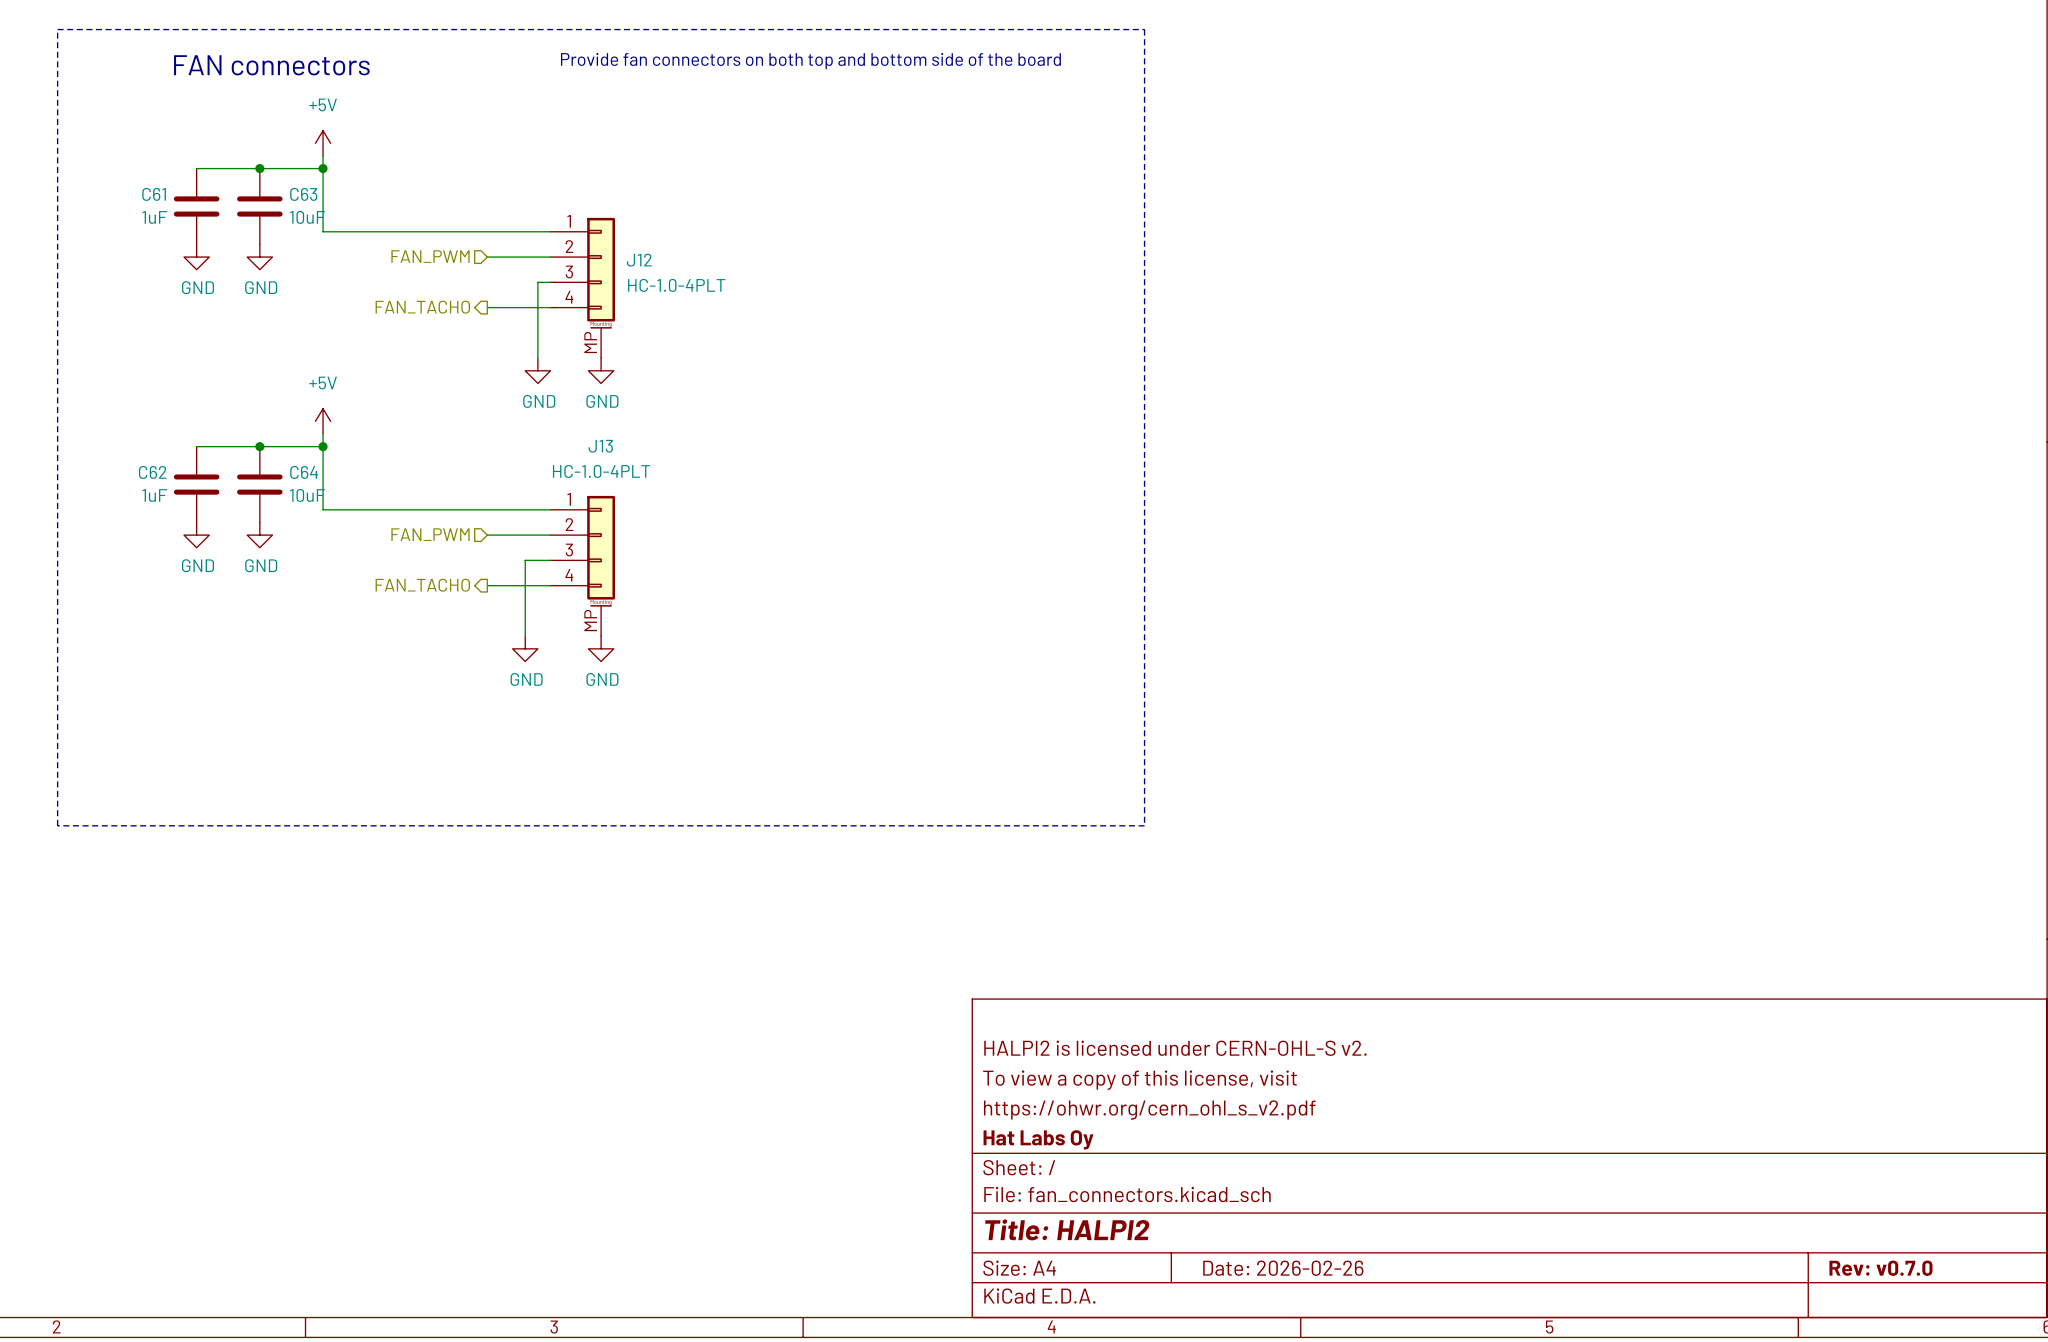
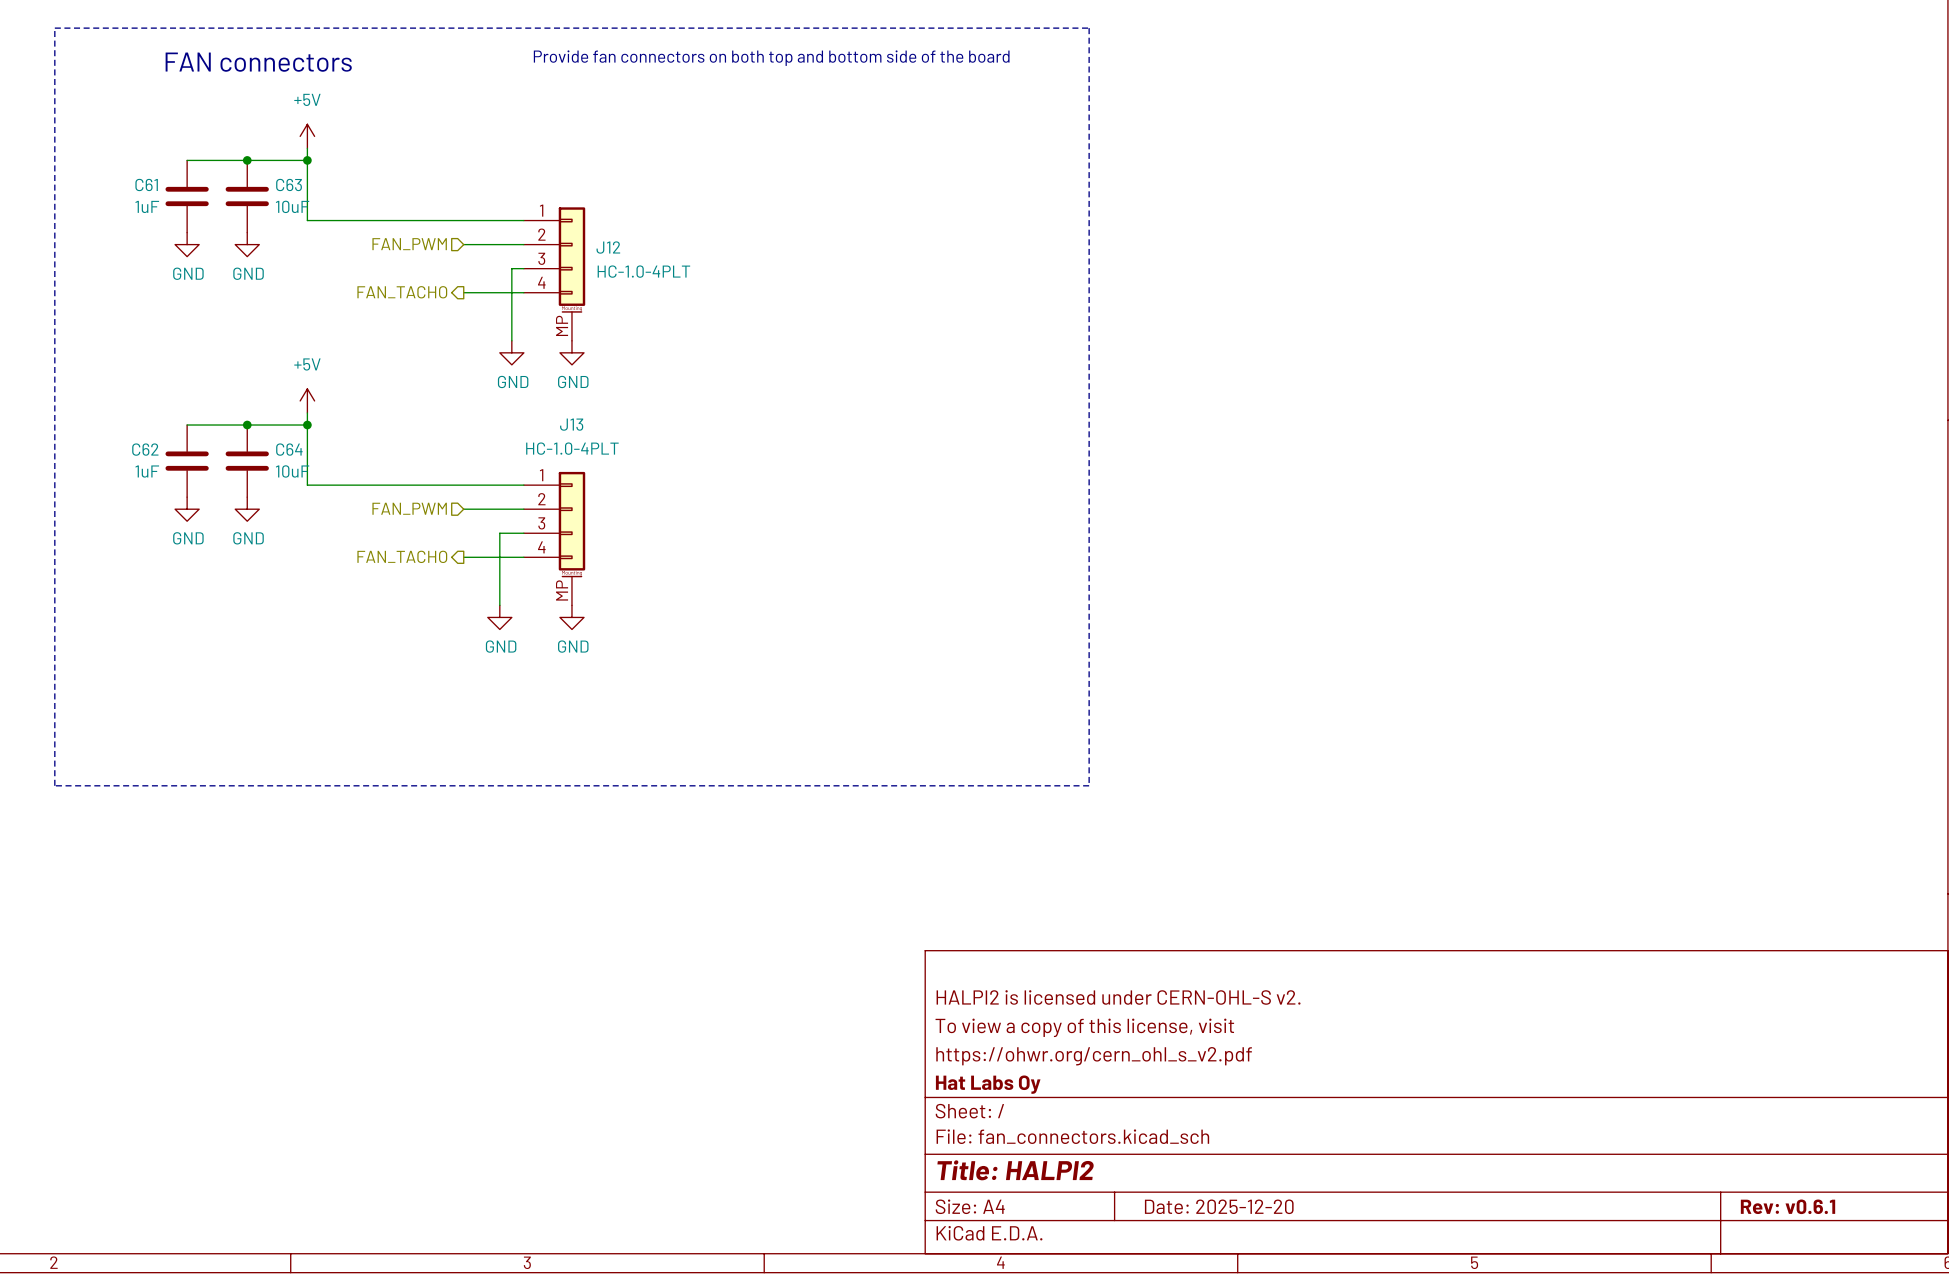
title block: Date: 2026-02-26 (1283, 1268) -> Date: 2025-12-20 (1219, 1206)
title block: Rev: v0.7.0 (1880, 1268) -> Rev: v0.6.1 (1788, 1206)

